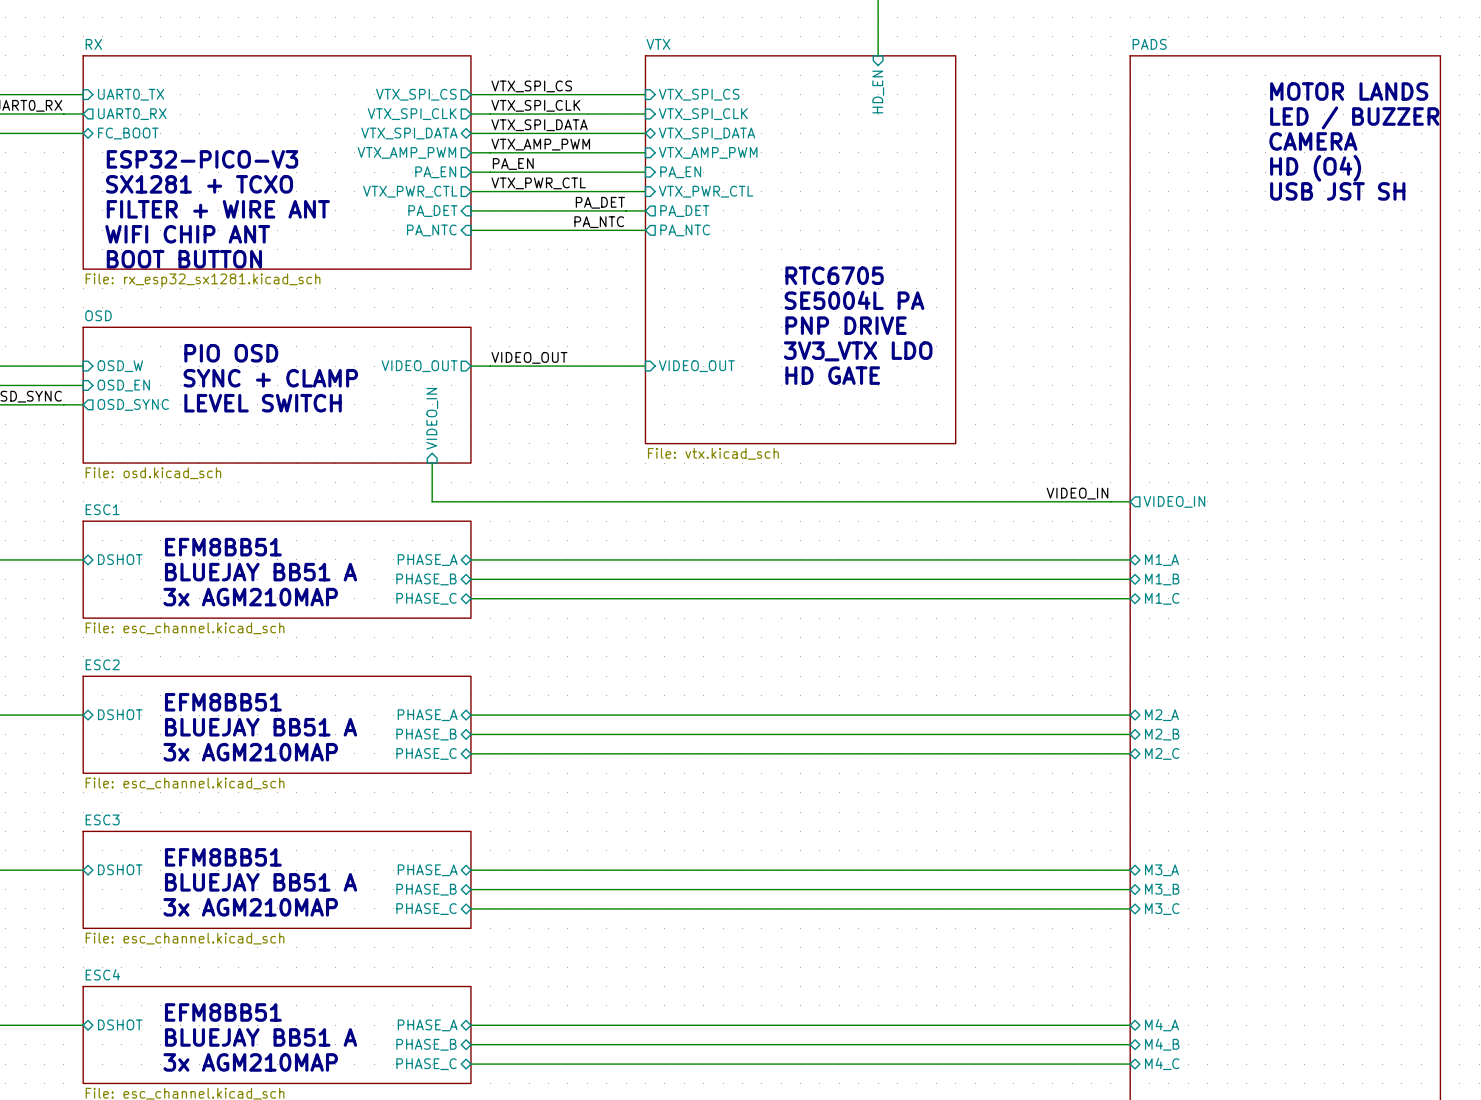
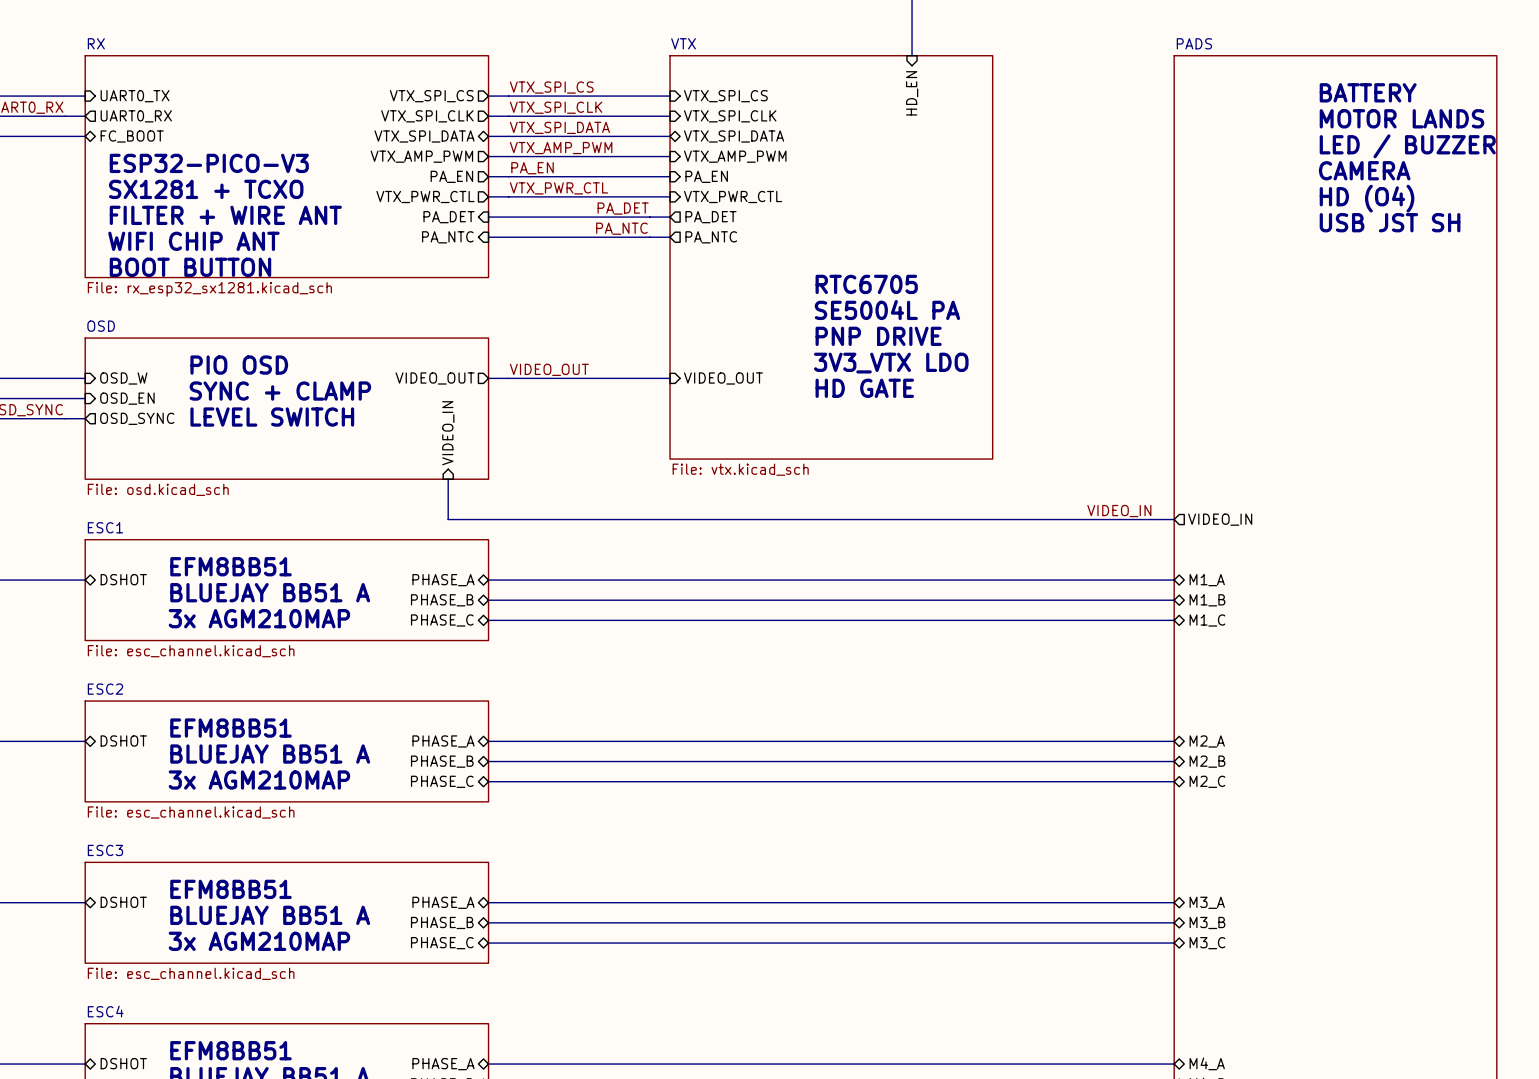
text: MOTOR LANDS (1349, 91) -> BATTERY (1368, 92)
text: LED / BUZZER (1354, 117) -> MOTOR LANDS (1401, 118)
text: CAMERA (1313, 141) -> LED / BUZZER (1407, 146)
text: HD (O4) (1315, 168) -> CAMERA (1364, 170)
text: USB JST SH (1337, 191) -> HD (O4) (1367, 198)
text: none -> USB JST SH (1390, 222)

